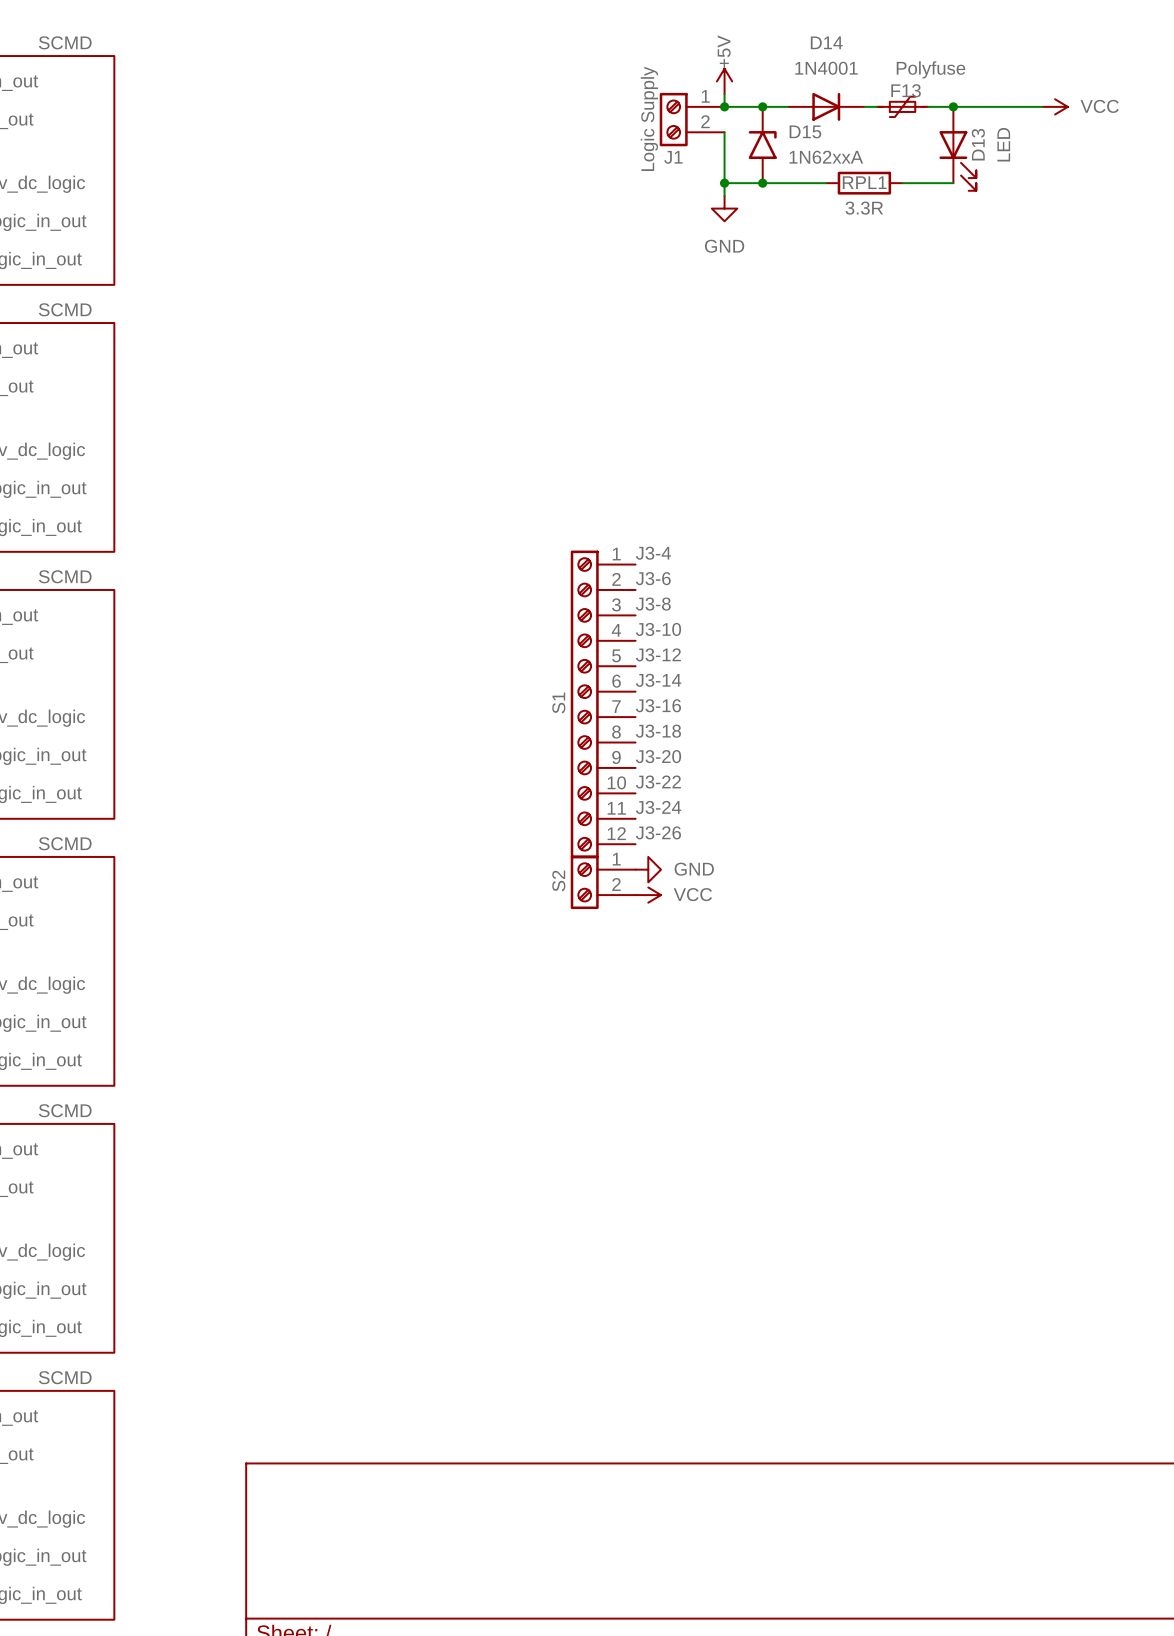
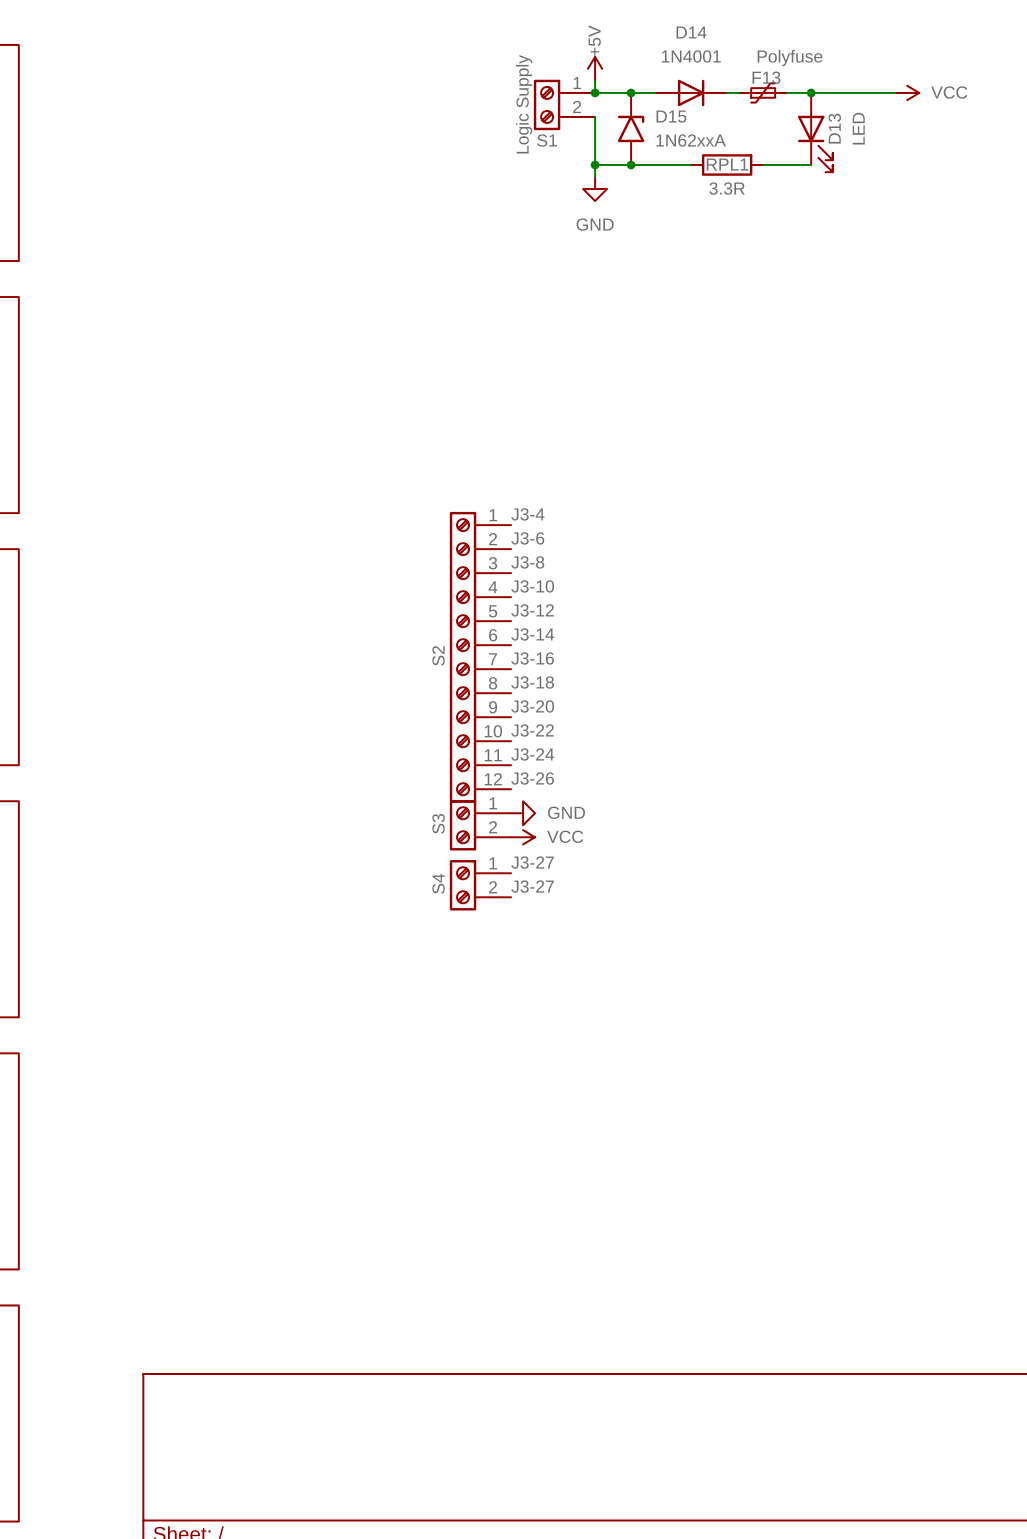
J1 name: J1 (673, 157) -> S1 (547, 140)
S1 name: S1 (558, 703) -> S2 (438, 655)
S2 name: S2 (558, 881) -> S3 (438, 823)
label: none -> J3-27 (532, 862)
S4: none -> (480, 885)
label: none -> J3-27 (532, 886)

